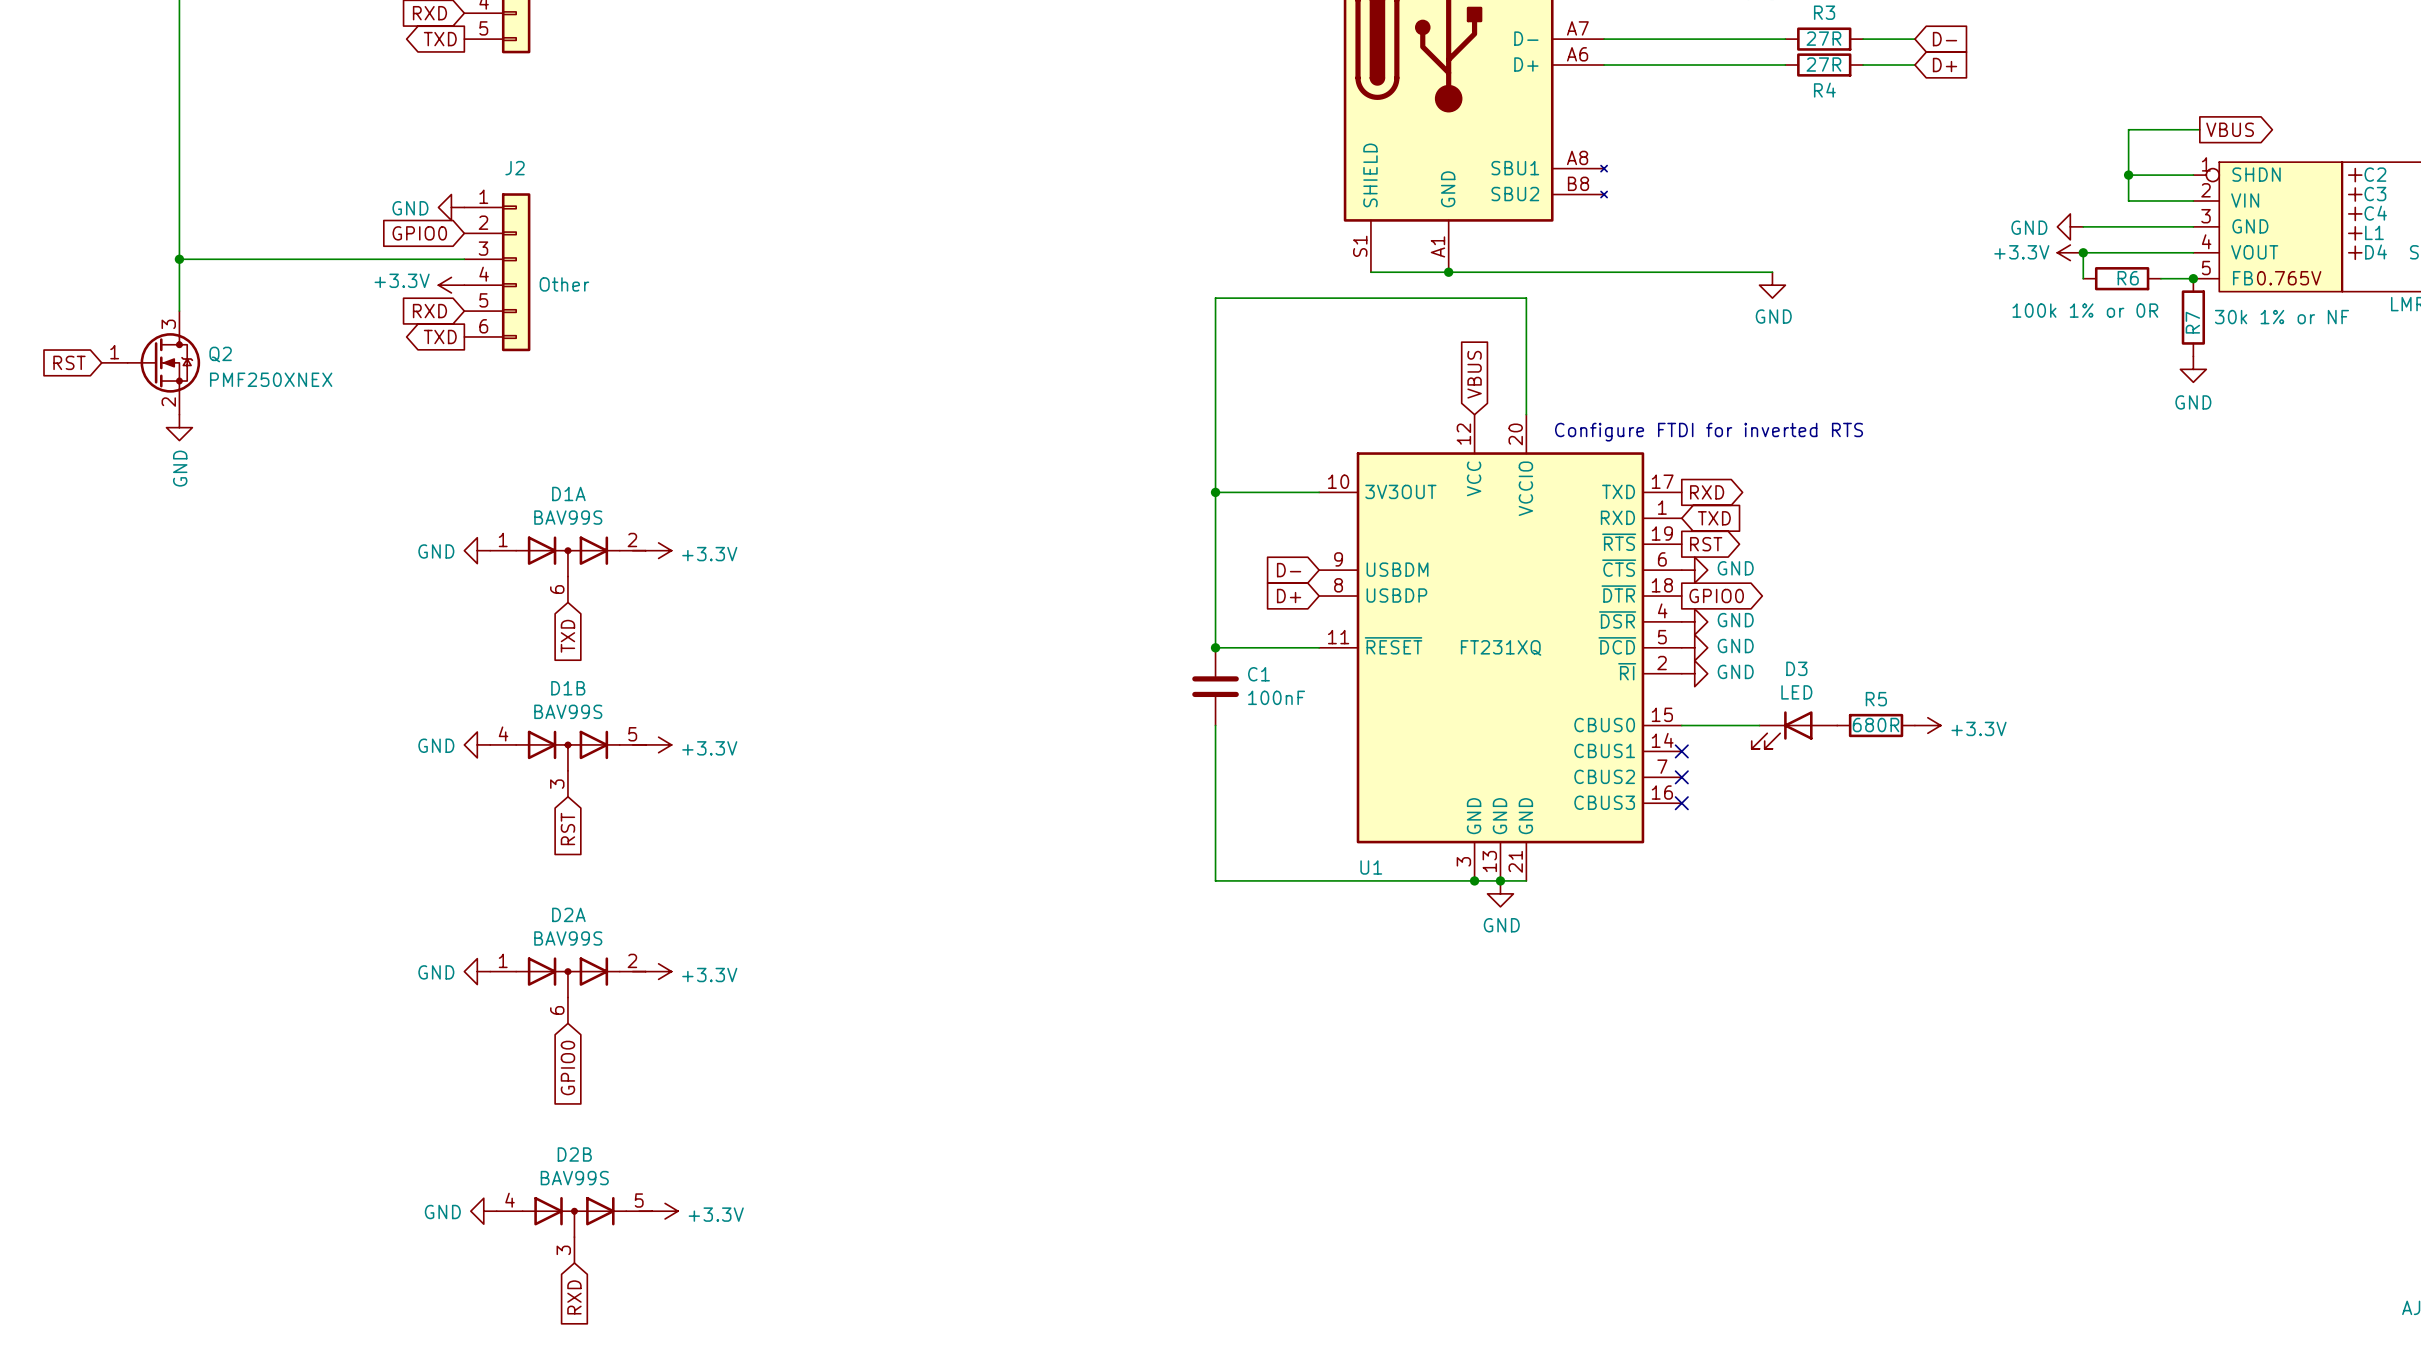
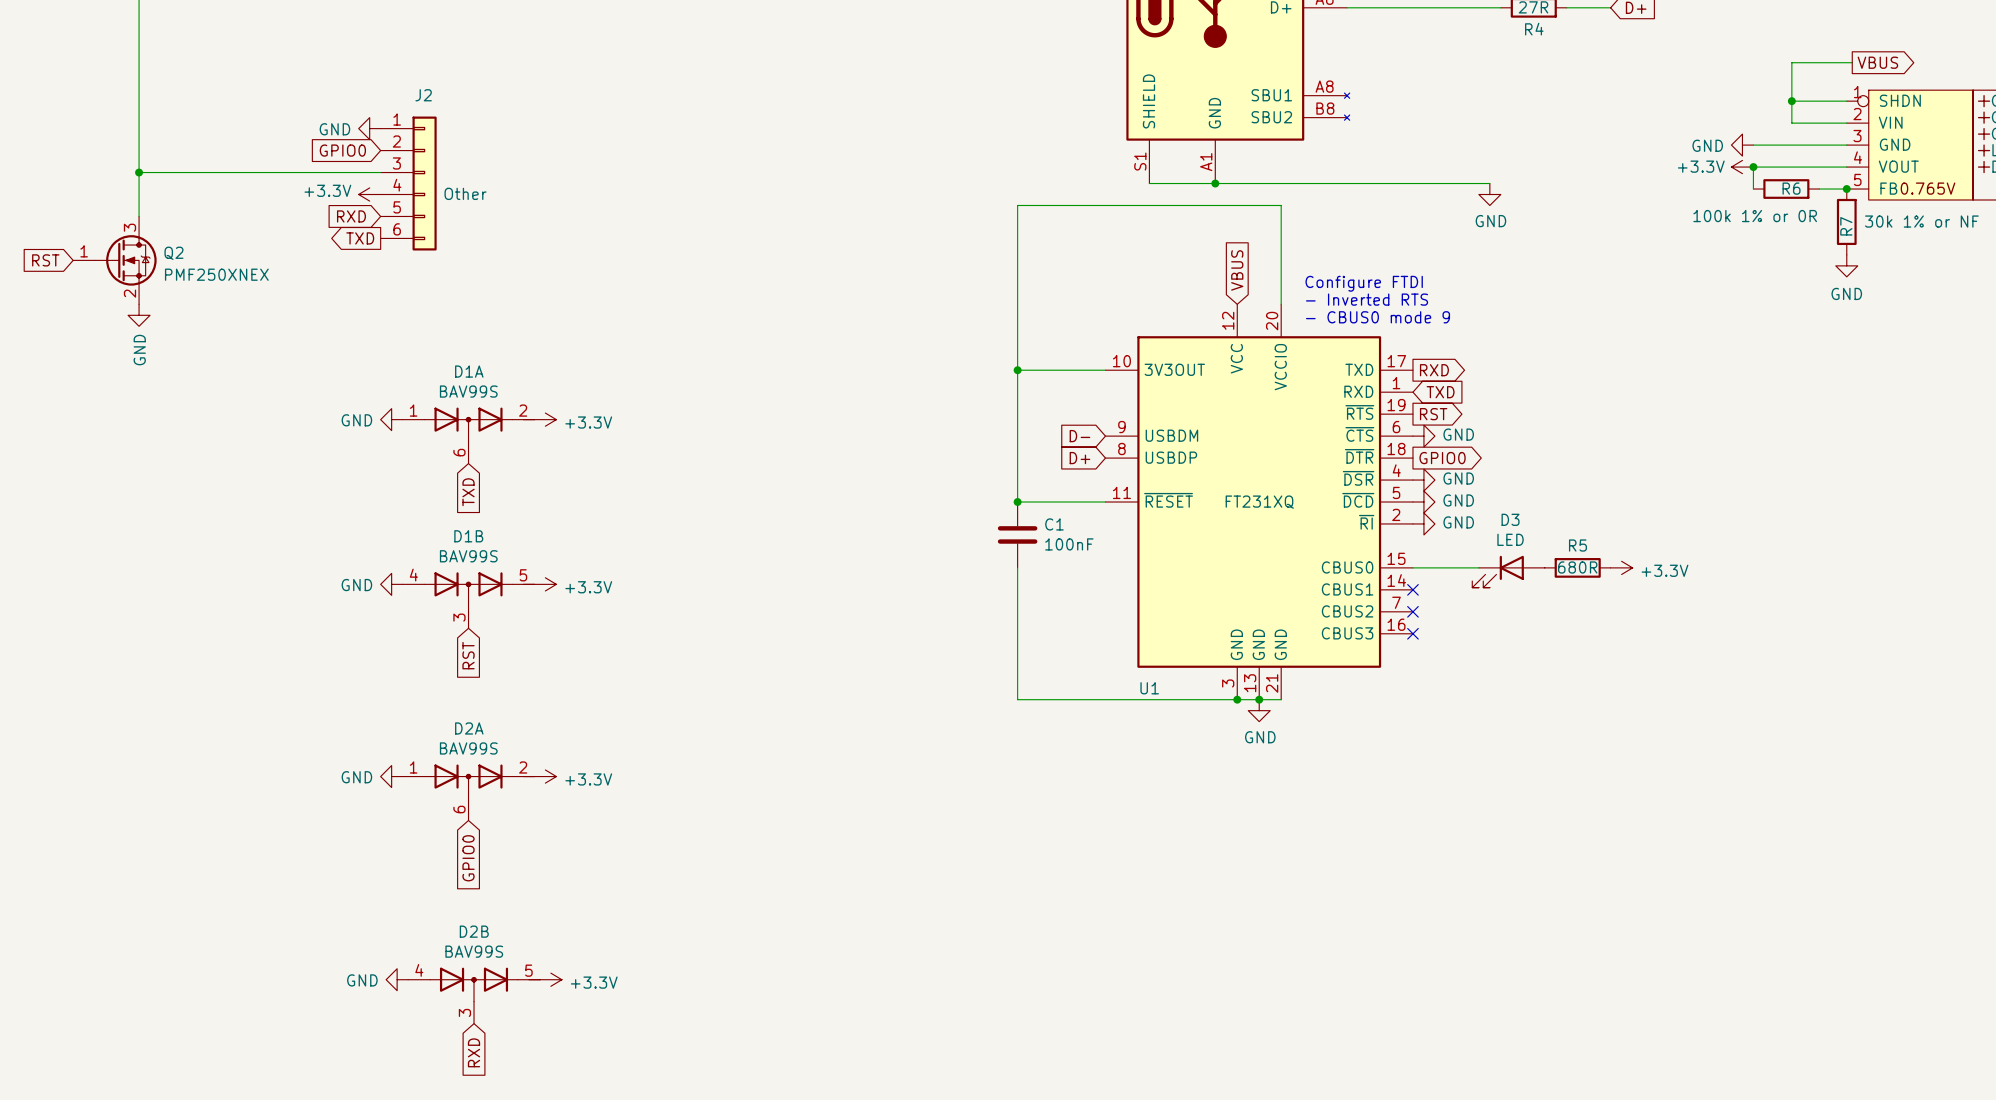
text: none -> Configure FTDI (1364, 283)
text: none -> - Inverted RTS (1367, 299)
text: Configure FTDI for inverted RTS (1709, 432) -> - CBUS0 mode 9 (1378, 317)

